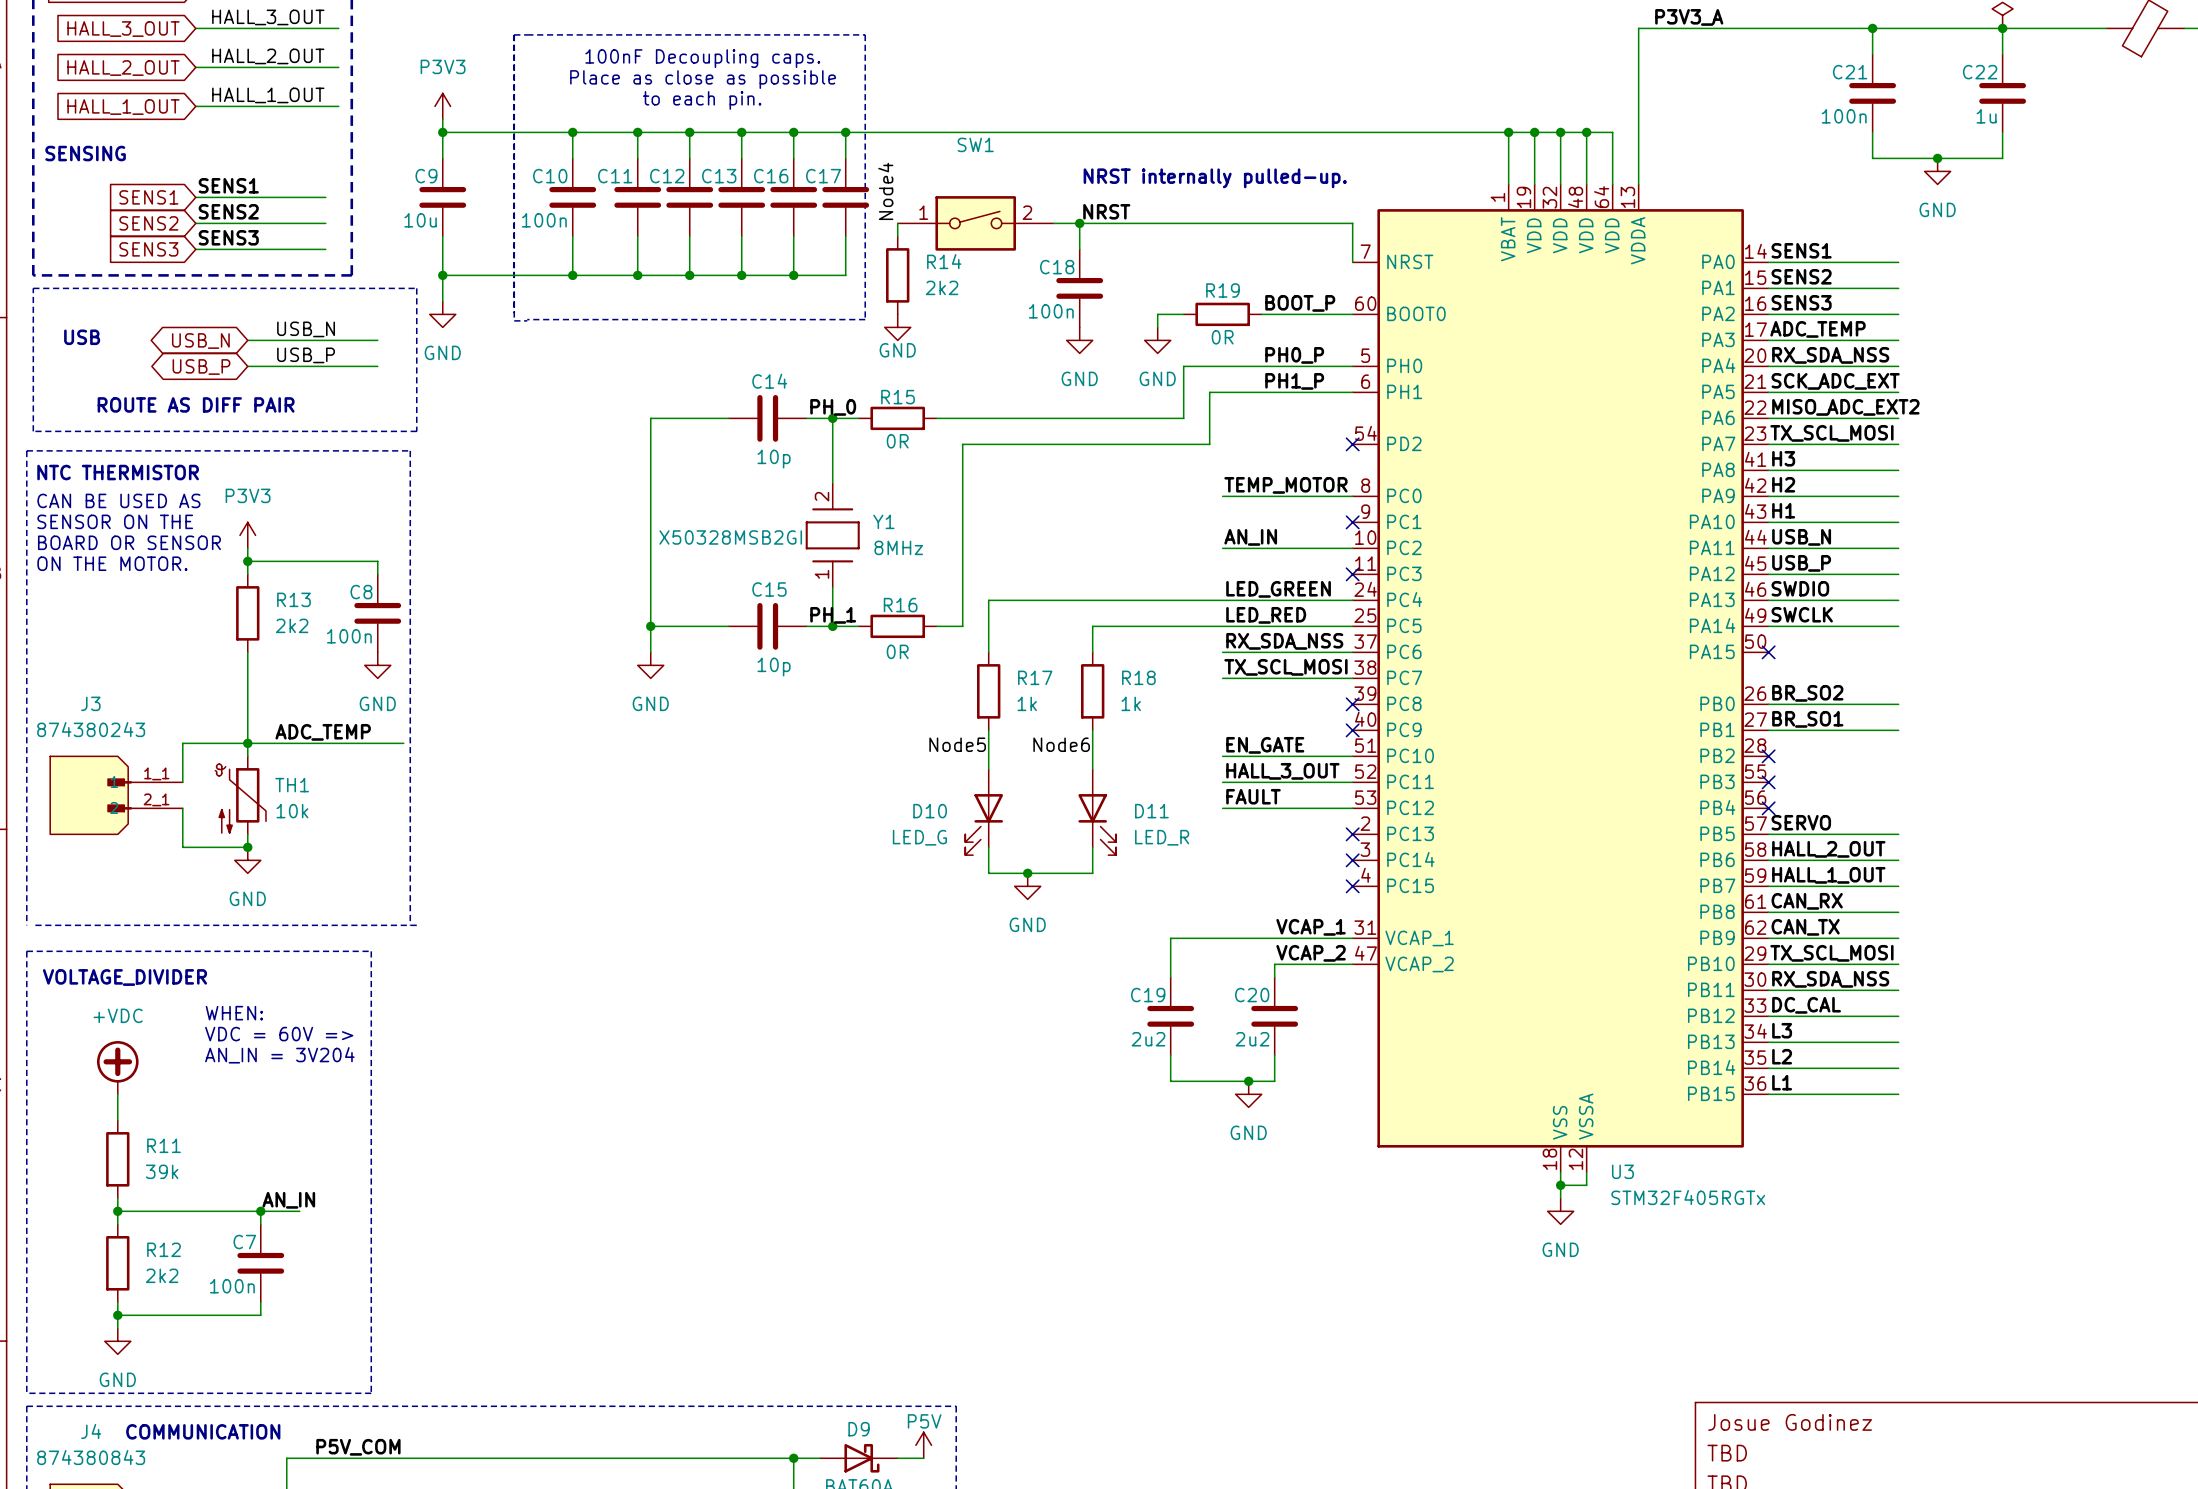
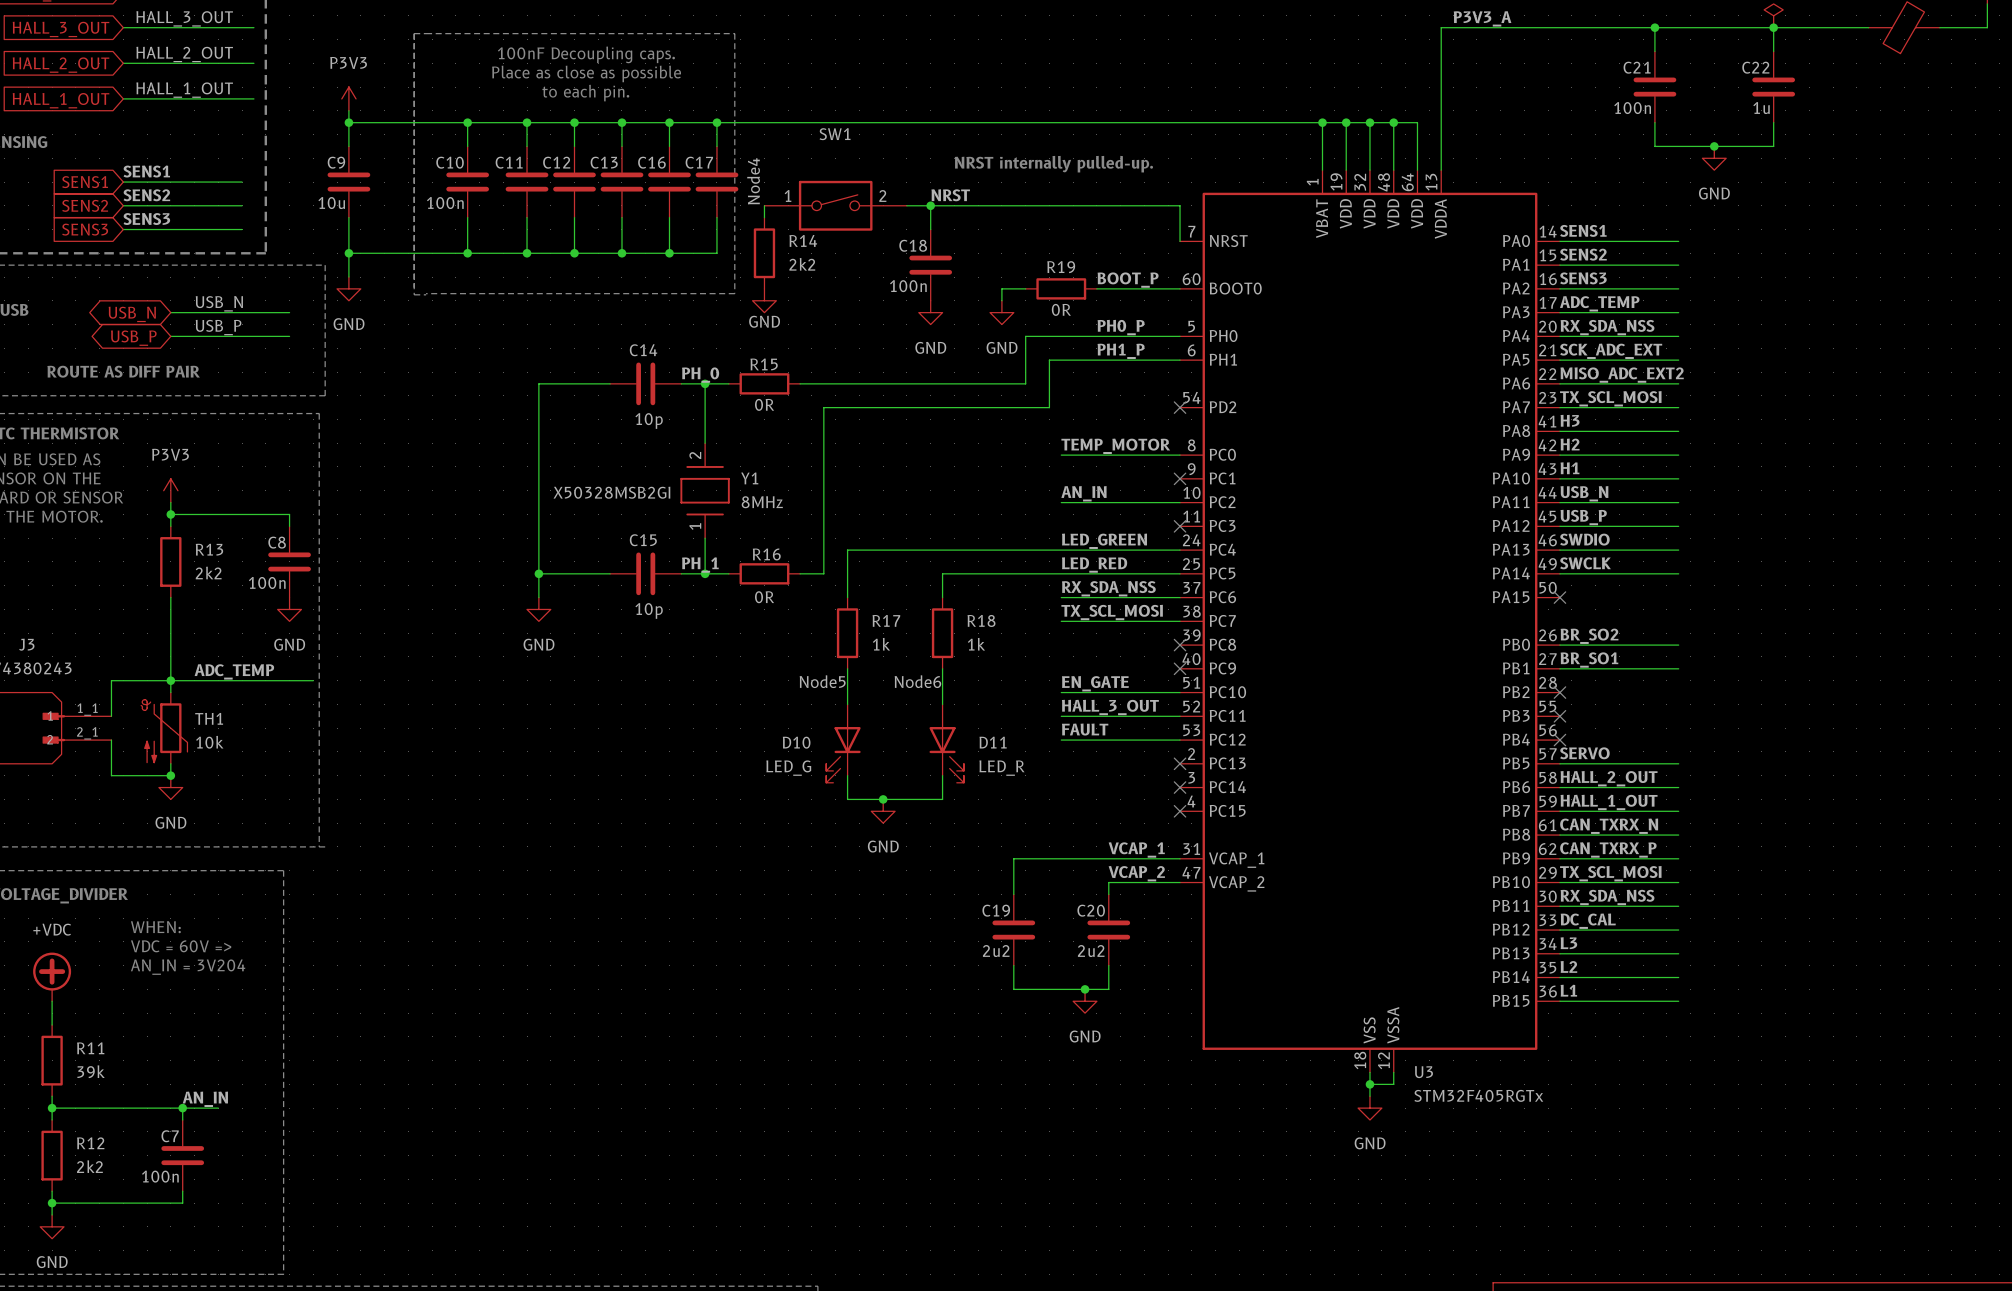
label: CAN_RX (1807, 901) -> CAN_TXRX_N (1609, 826)
label: CAN_TX (1805, 927) -> CAN_TXRX_P (1608, 849)

